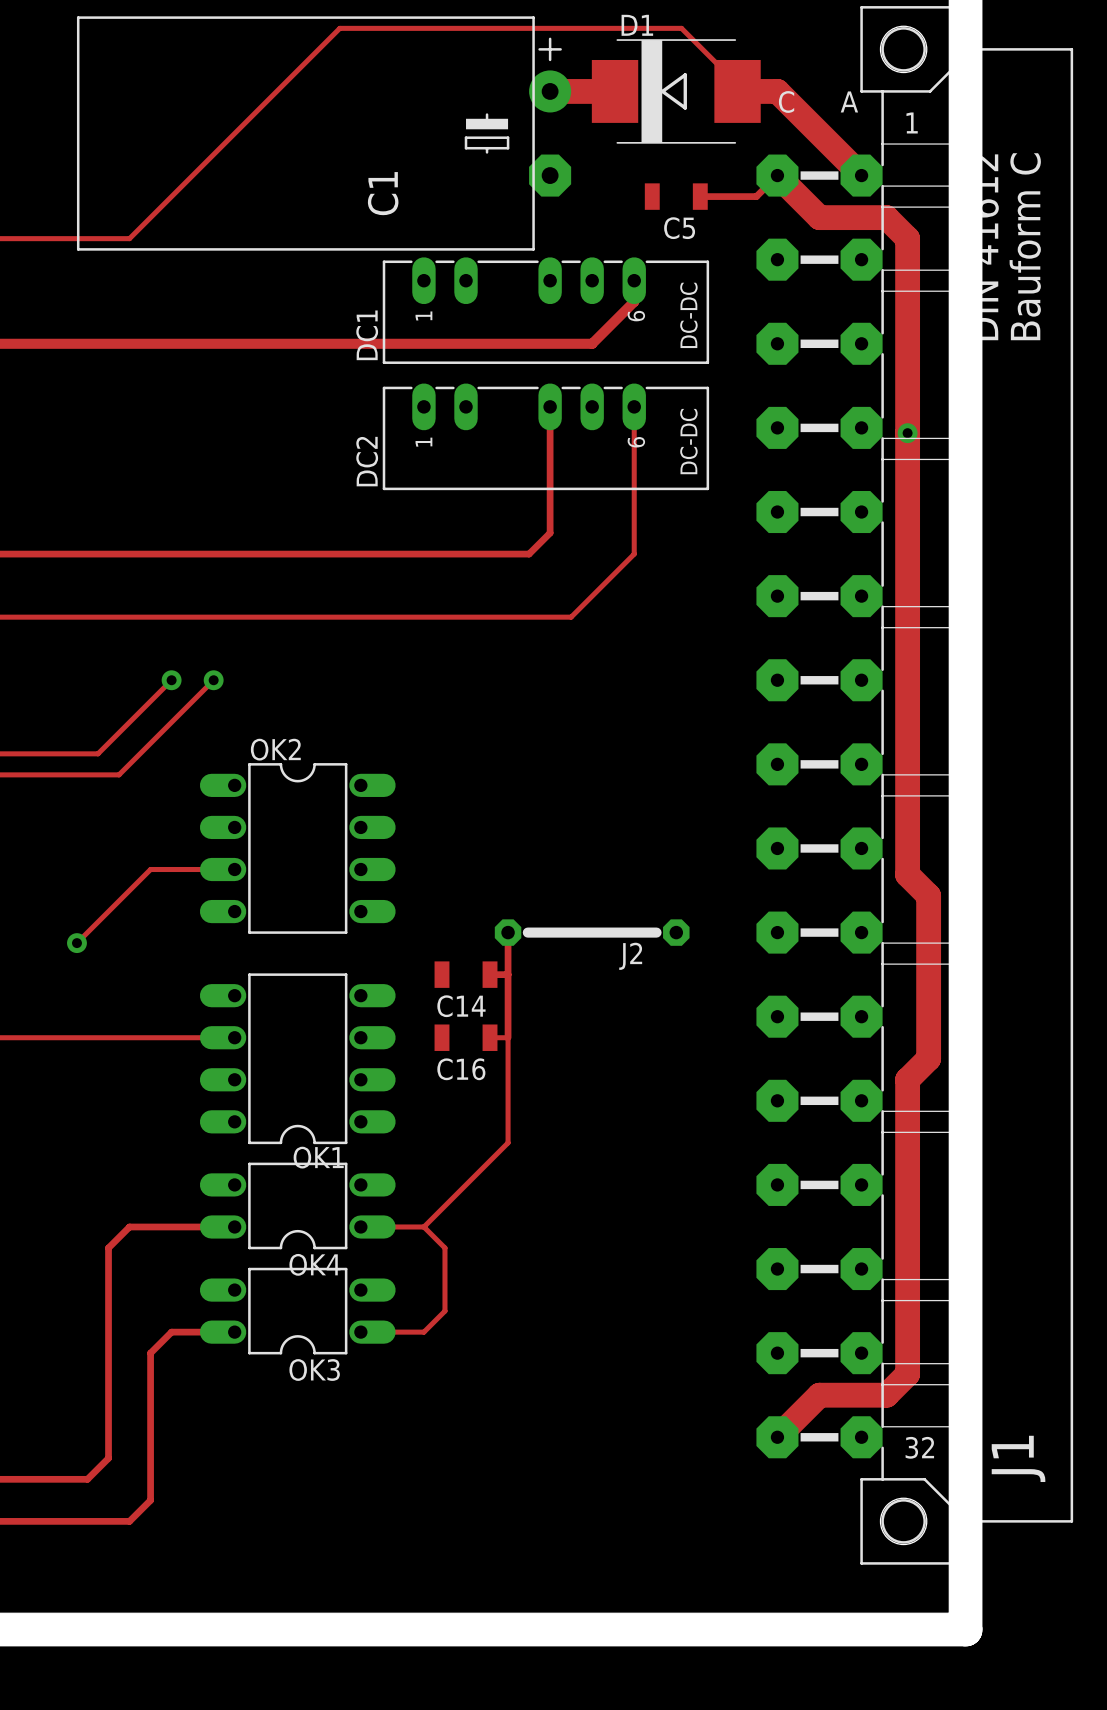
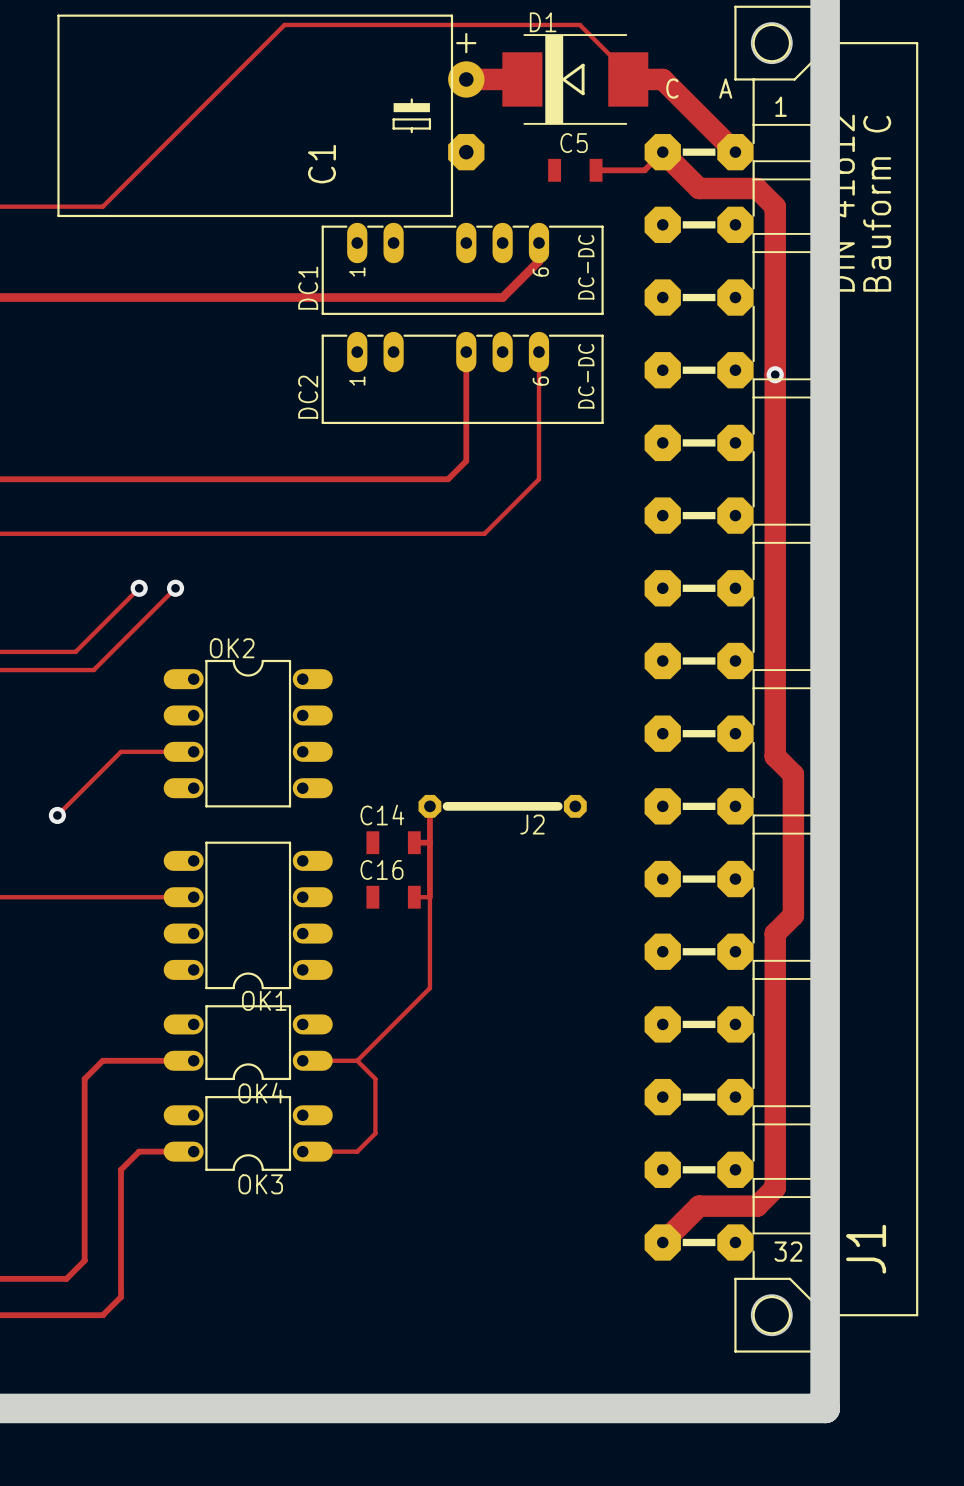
C5 name position: C5 (679, 228) -> C5 (574, 143)
C14 name position: C14 (461, 1006) -> C14 (382, 815)
C16 name position: C16 (461, 1069) -> C16 (381, 869)

